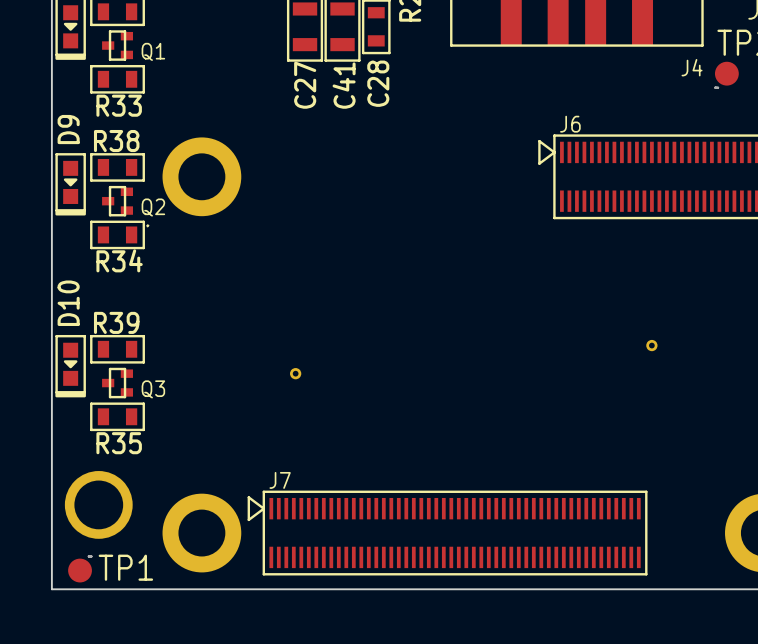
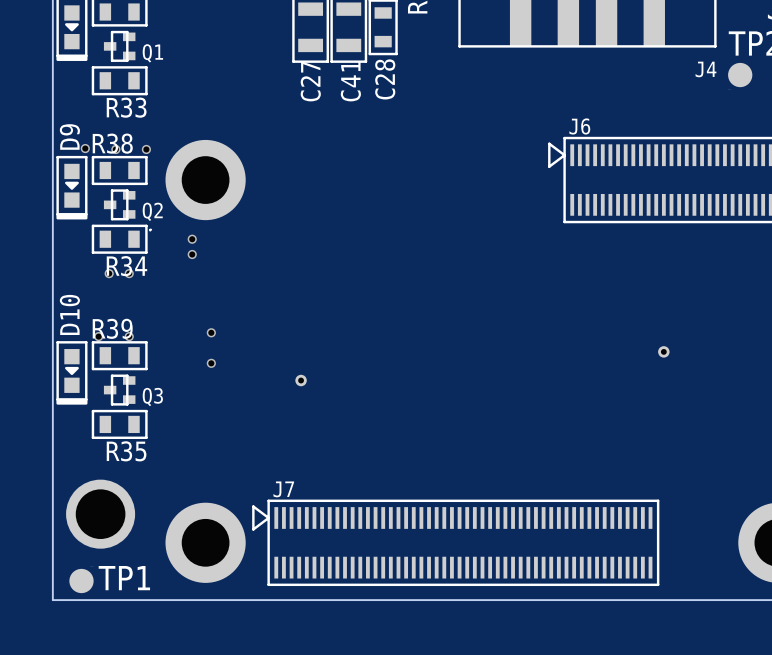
via: none -> (85, 148)
via: none -> (115, 149)
via: none -> (146, 149)
via: none -> (192, 239)
via: none -> (192, 254)
via: none -> (109, 273)
via: none -> (129, 273)
via: none -> (211, 332)
via: none -> (98, 336)
via: none -> (129, 336)
via: none -> (211, 363)

